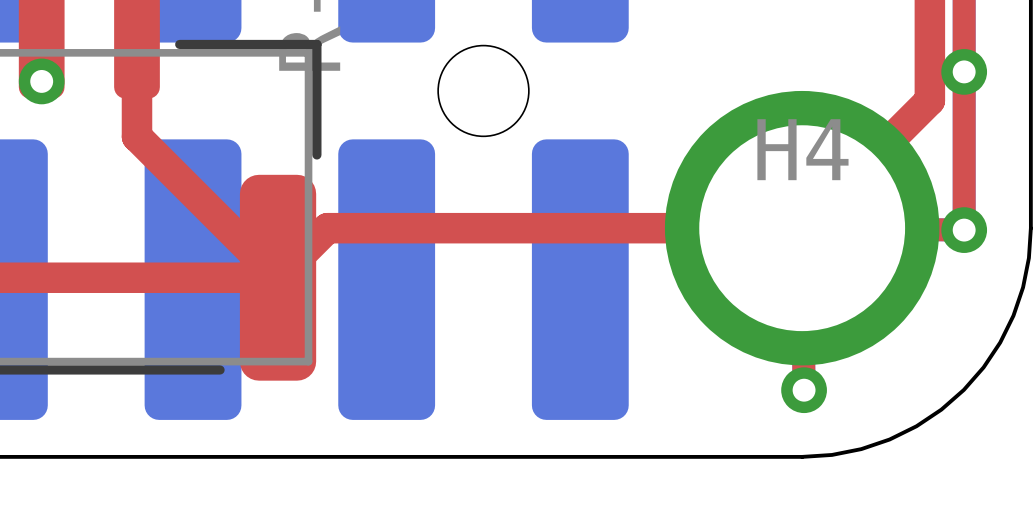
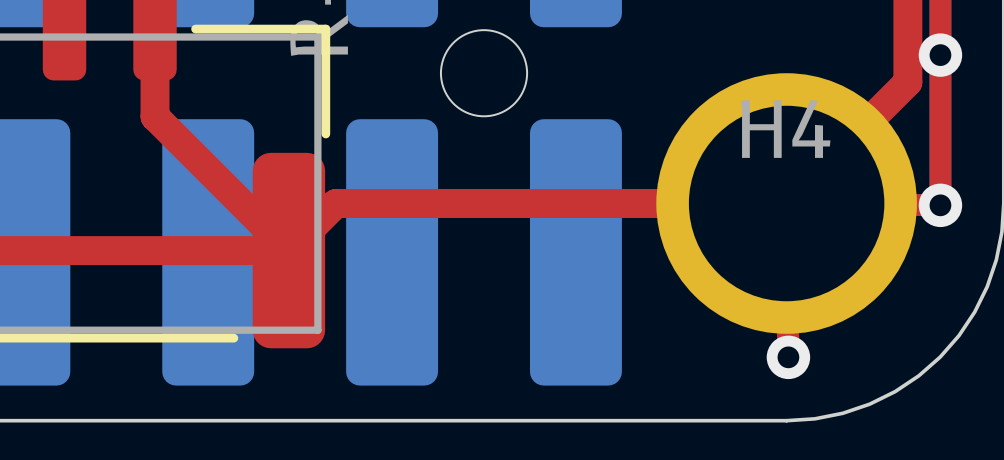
via: (41, 81) -> none

